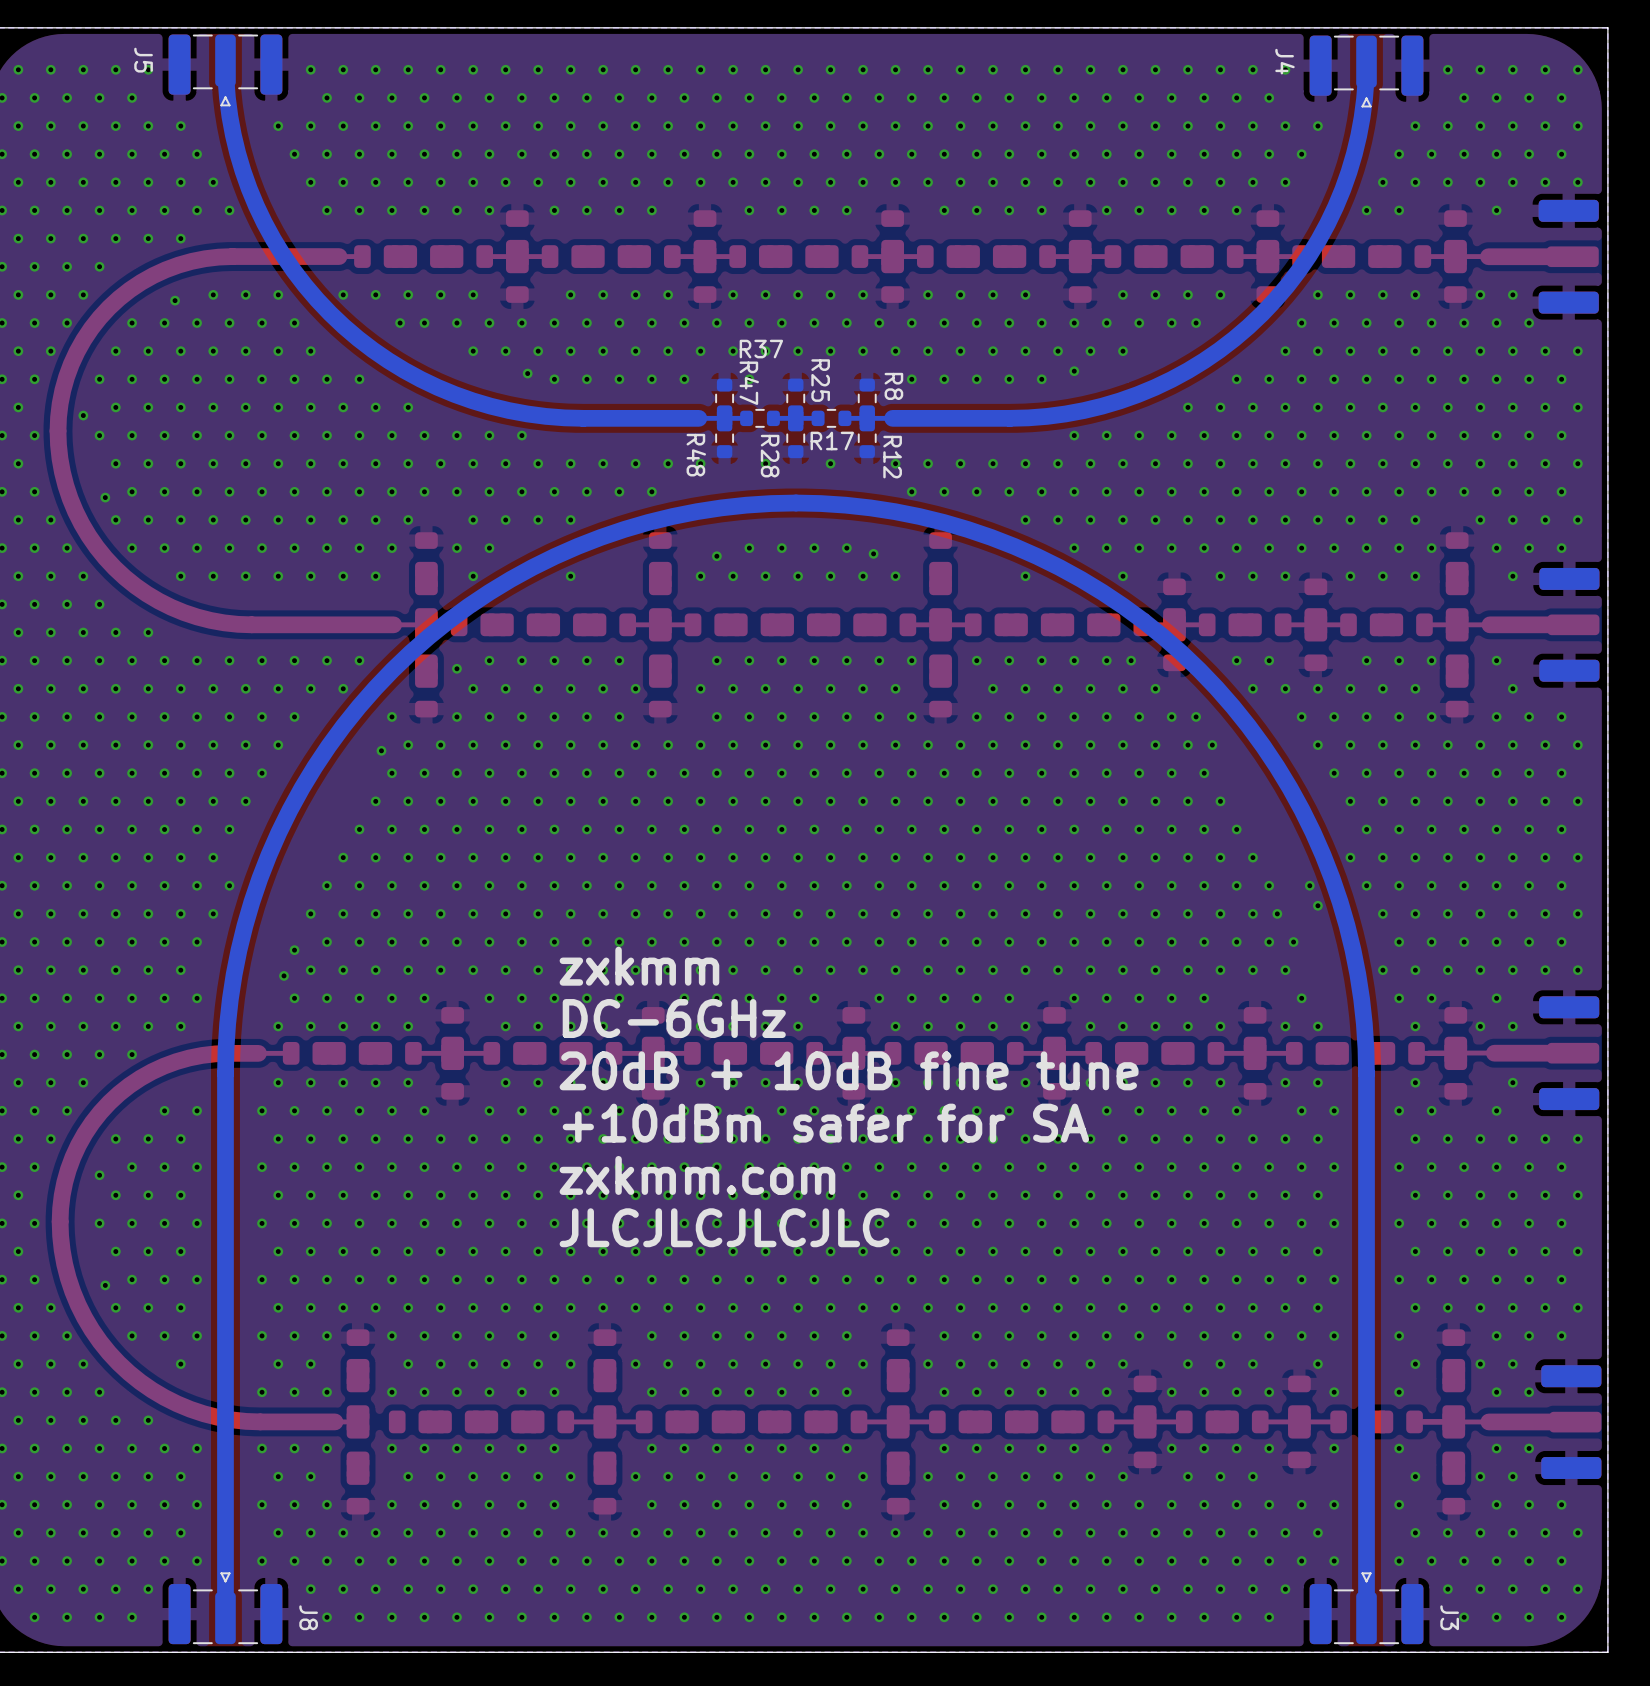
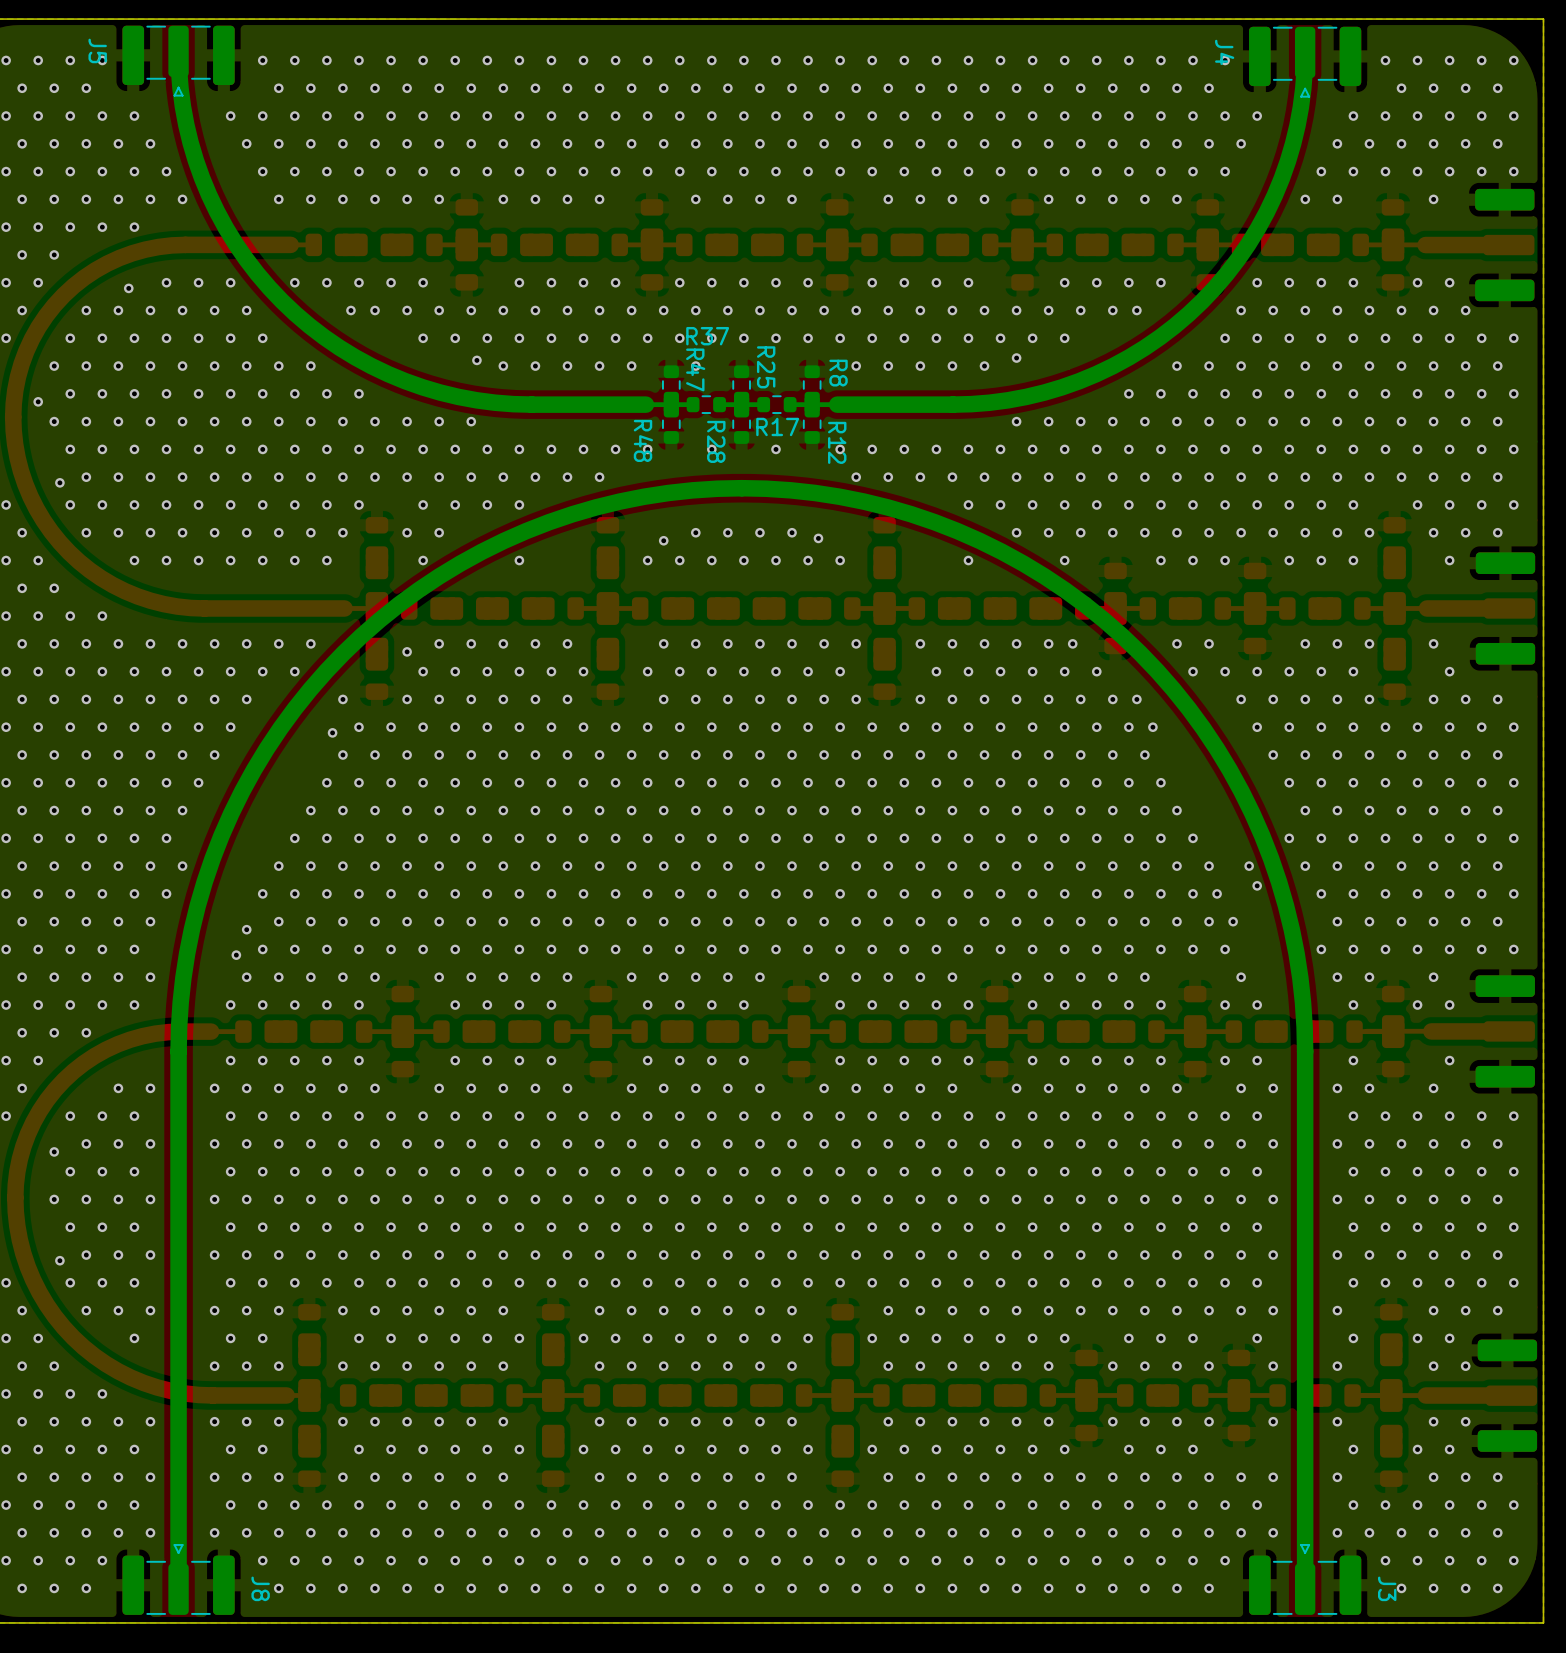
text: zxkmm (639, 966) -> none
text: DC-6GHz (674, 1018) -> none
text: 20dB + 10dB fine tune (849, 1070) -> none
text: +10dBm safer for SA (825, 1123) -> none
text: zxkmm.com (697, 1175) -> none
text: JLCJLCJLCJLC (724, 1227) -> none

